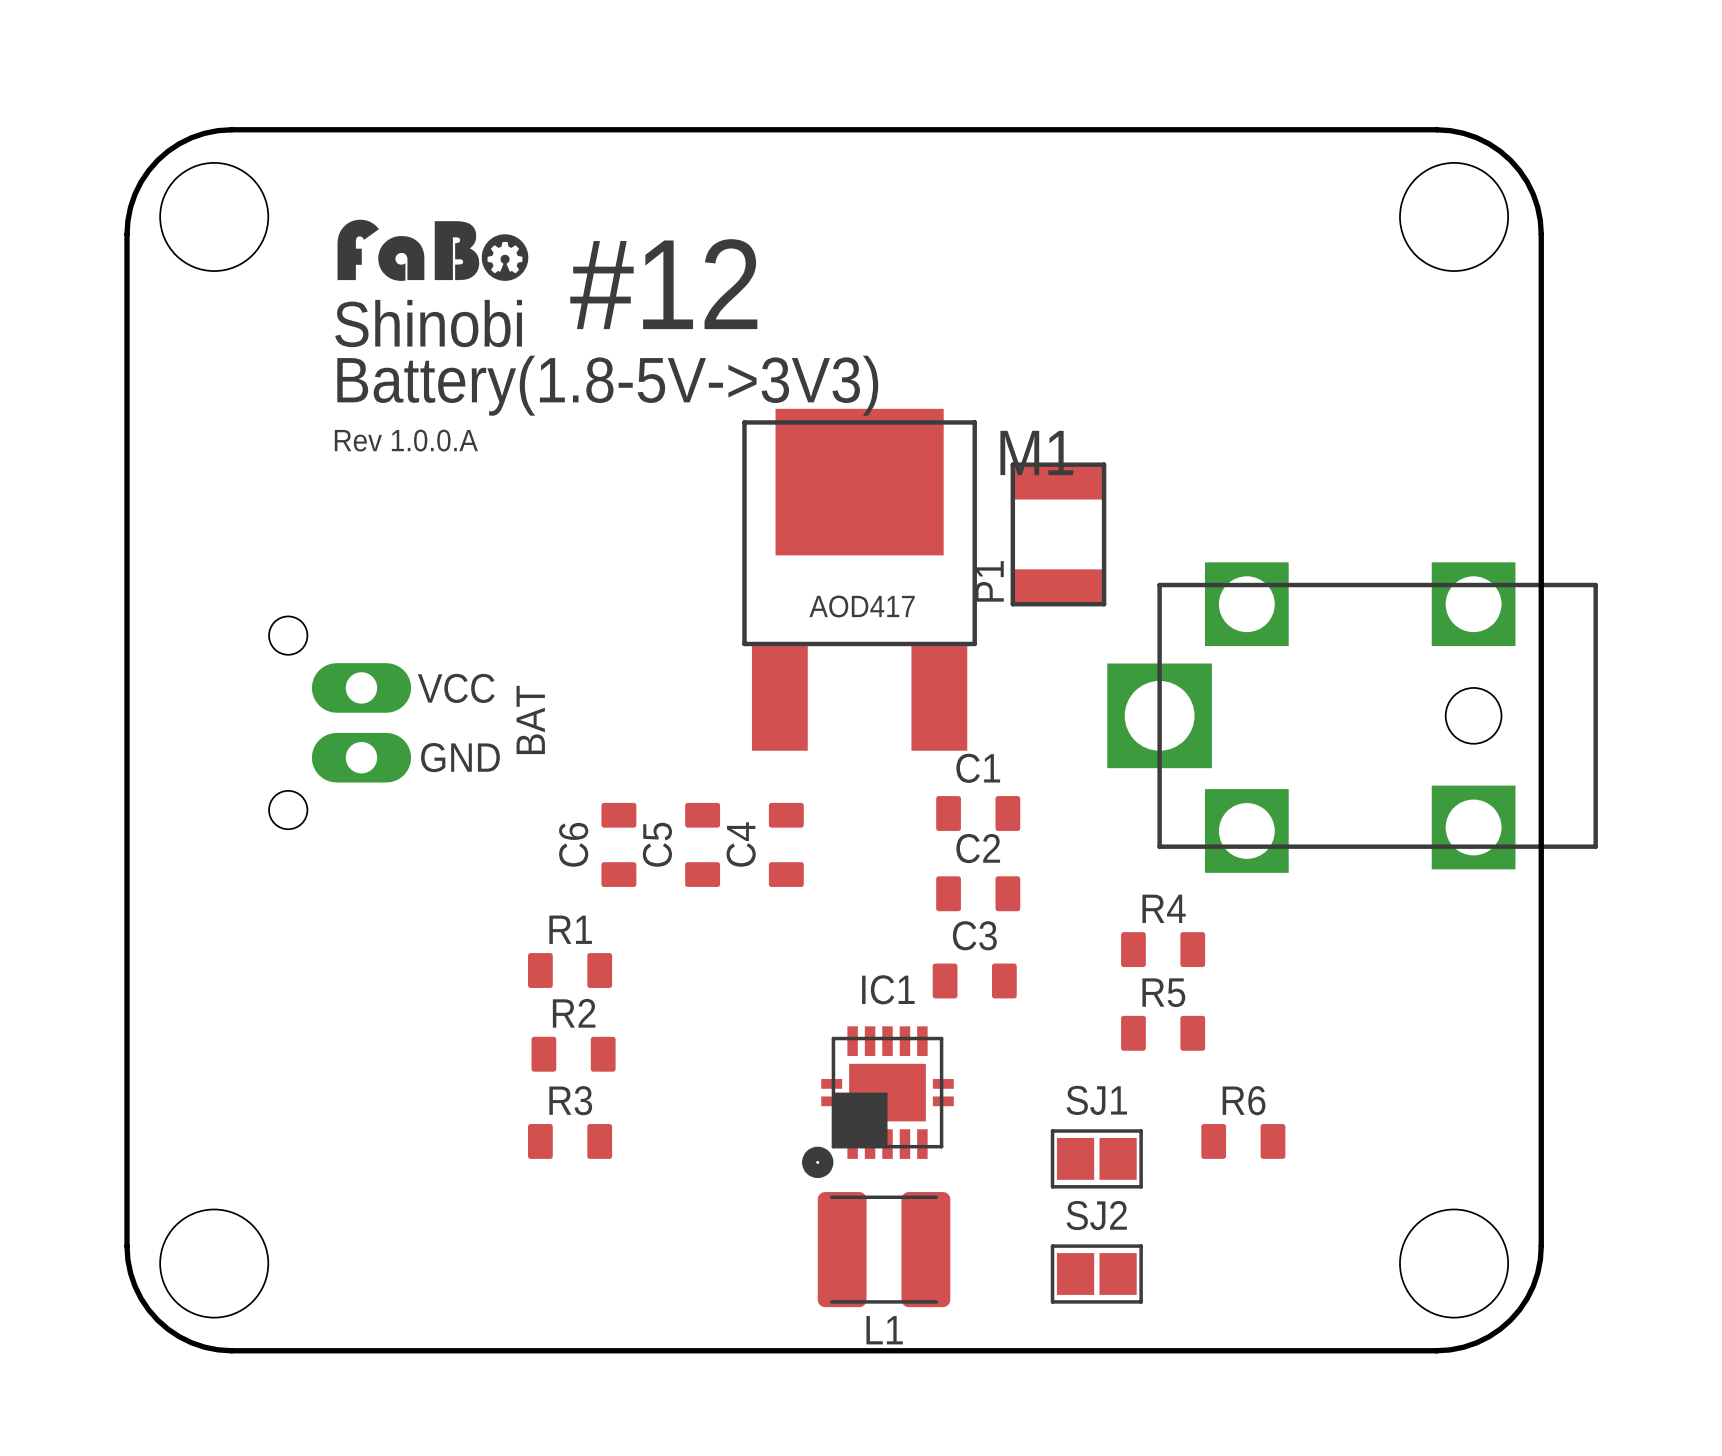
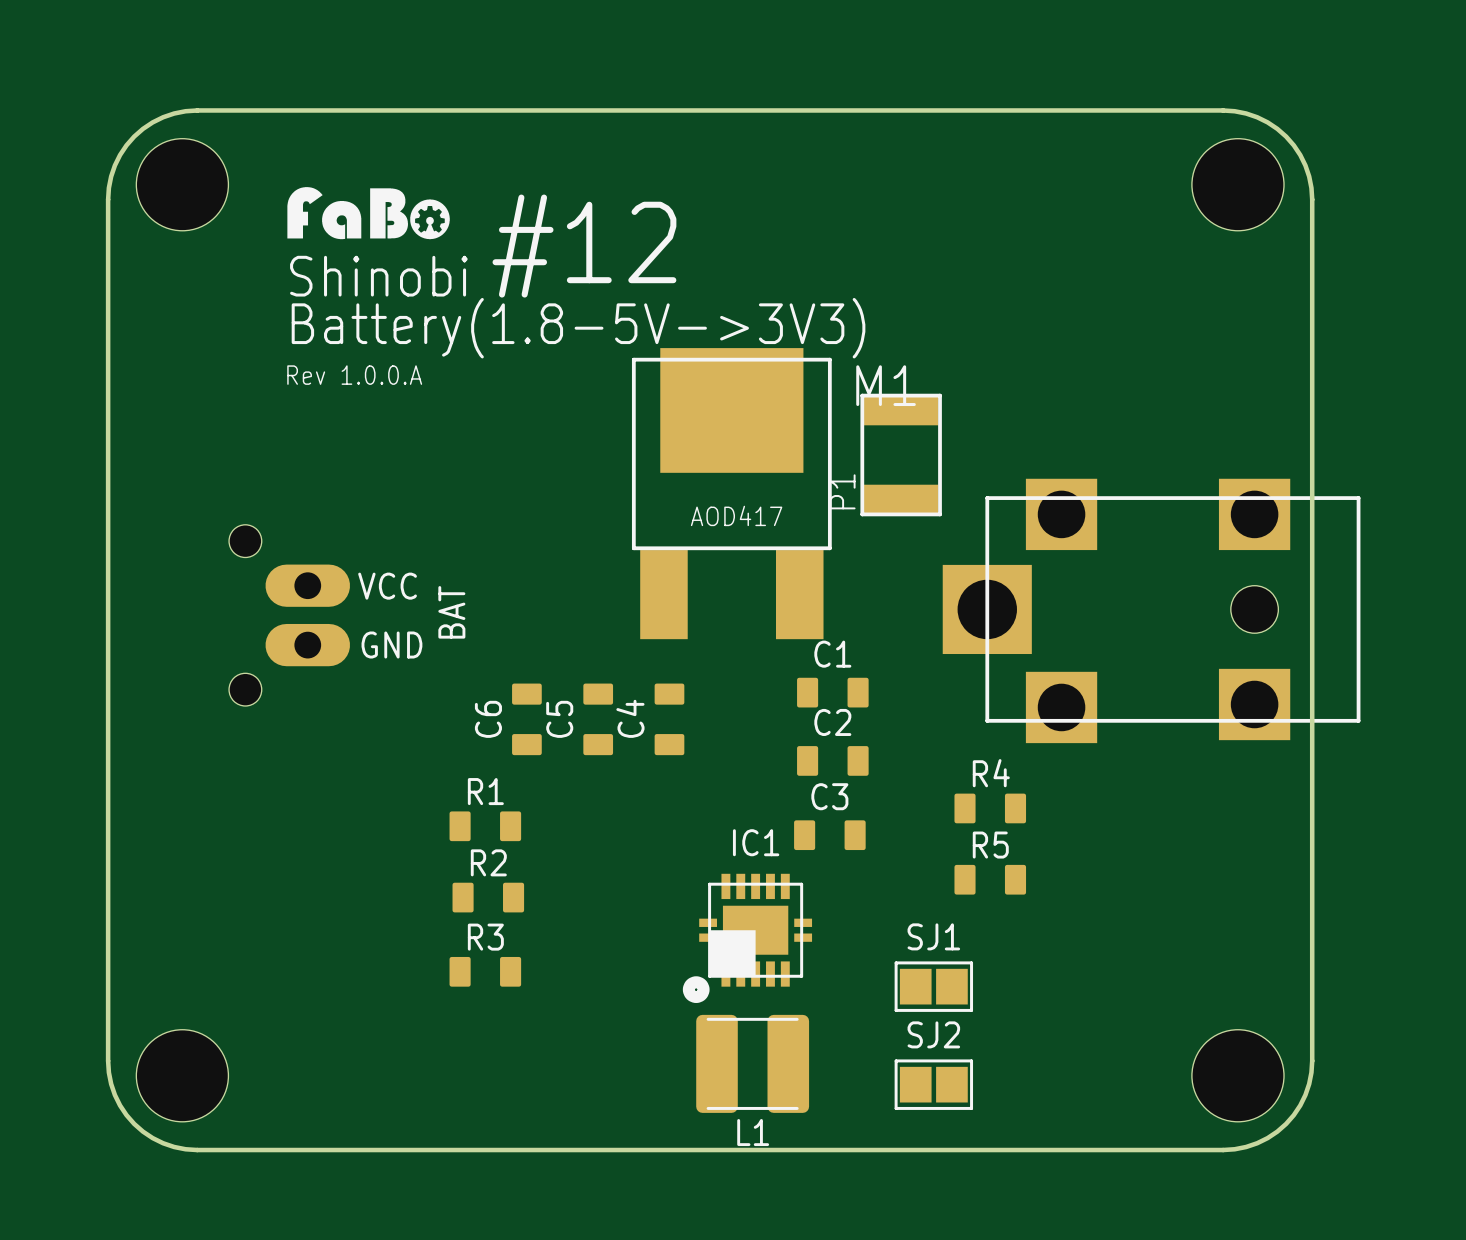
R6: (1243, 1141) -> none

